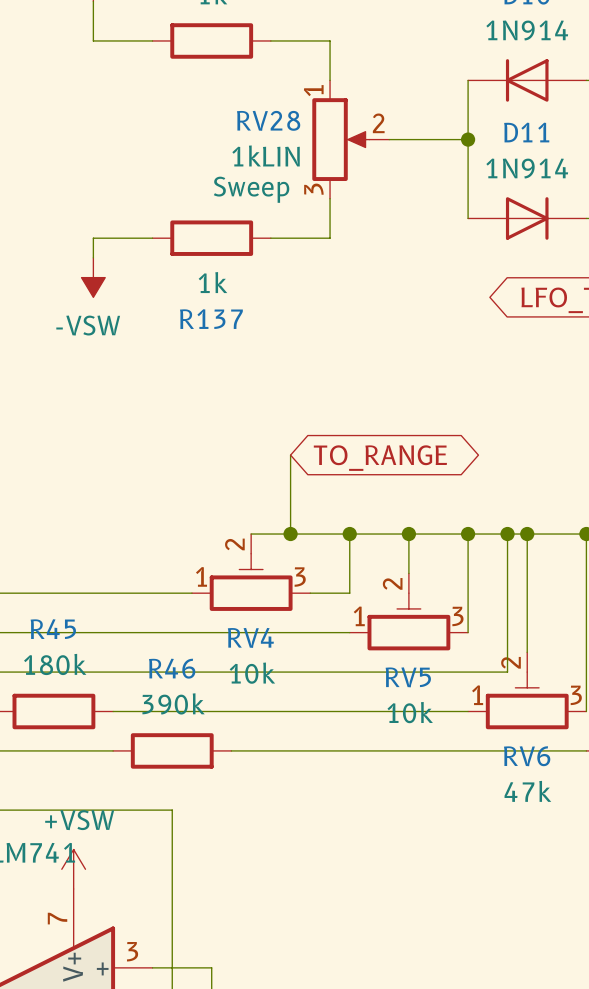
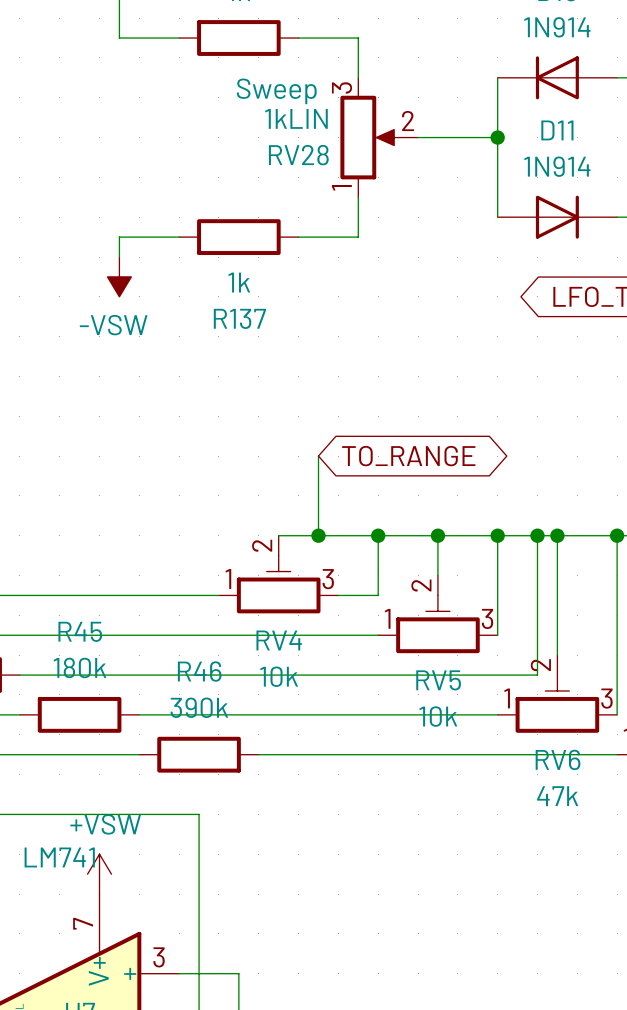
RV28 flip: as is (340, 139) -> up-down (369, 137)

